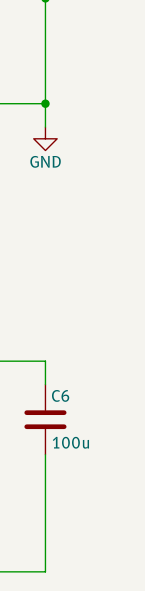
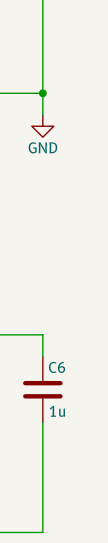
C6 value: 100u (70, 442) -> 1u (57, 411)

